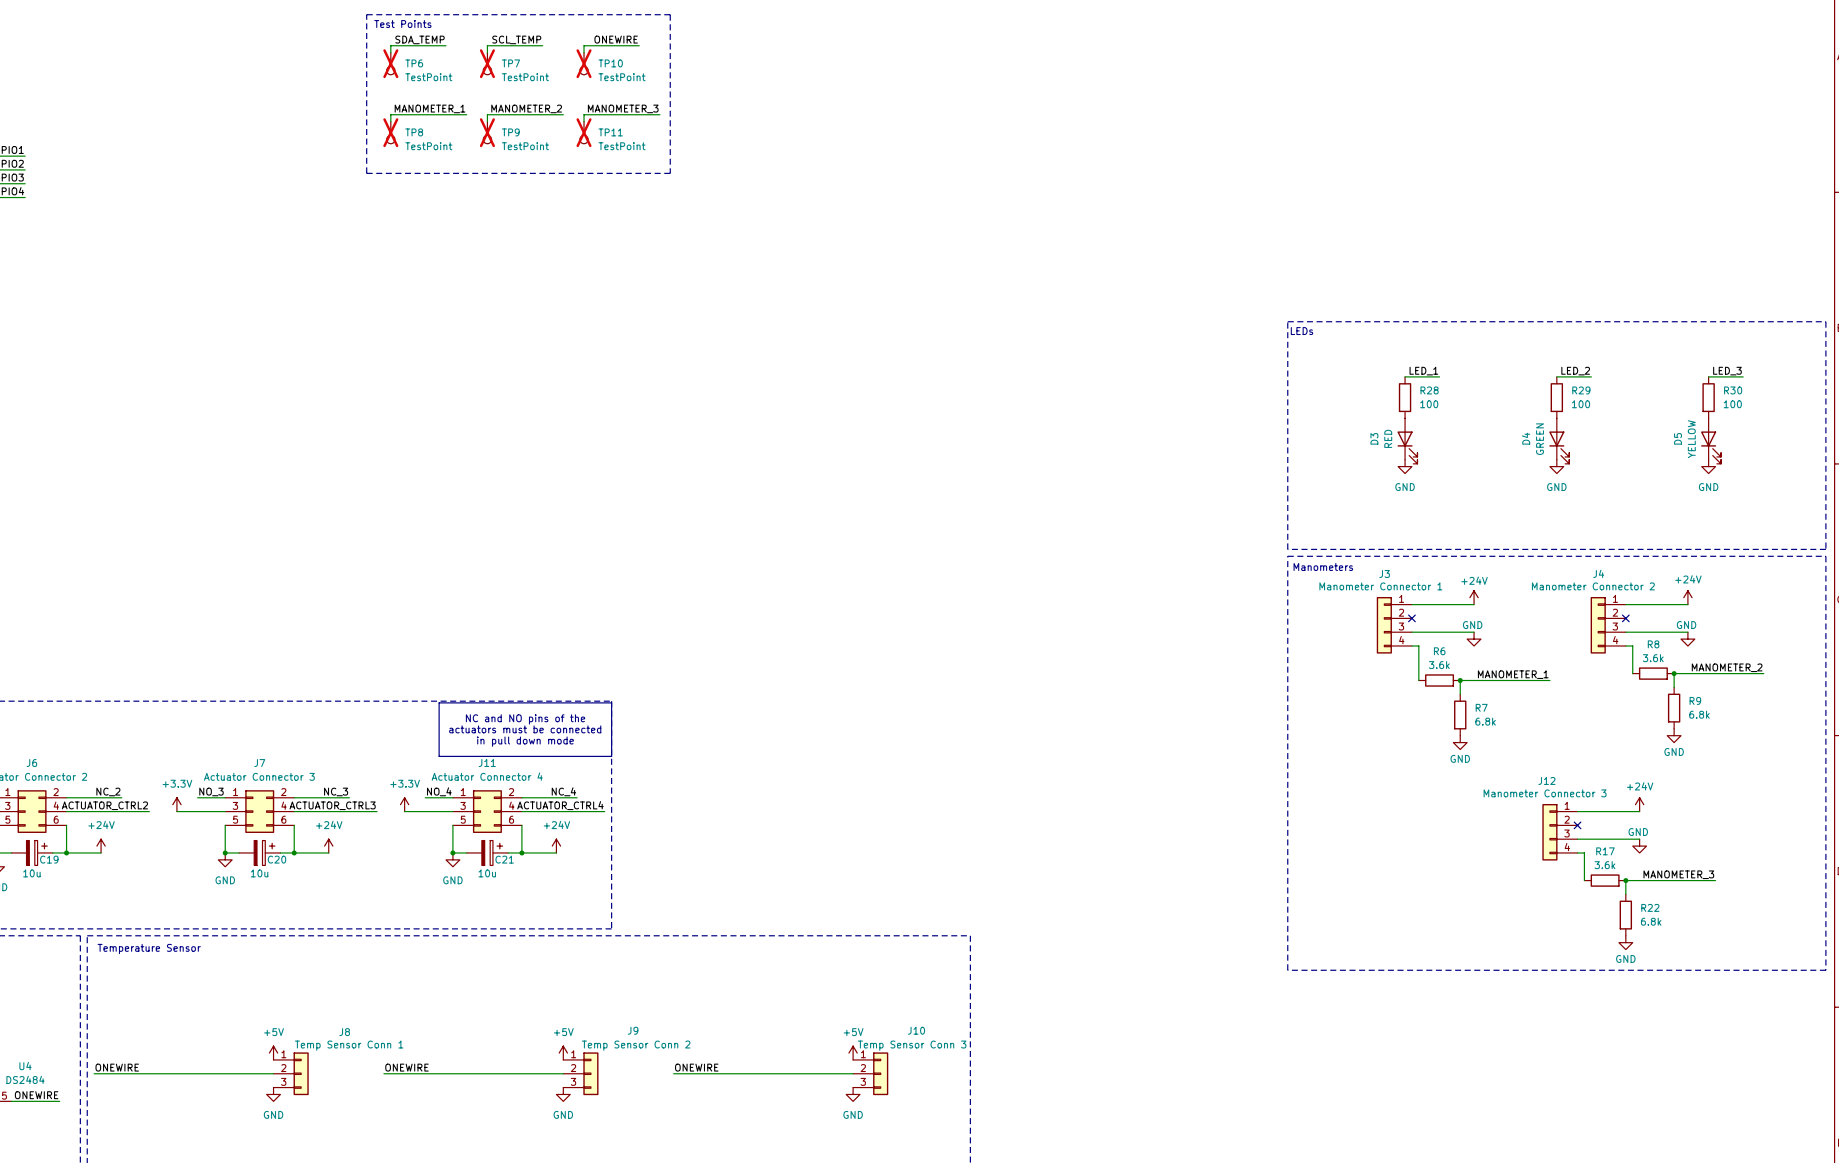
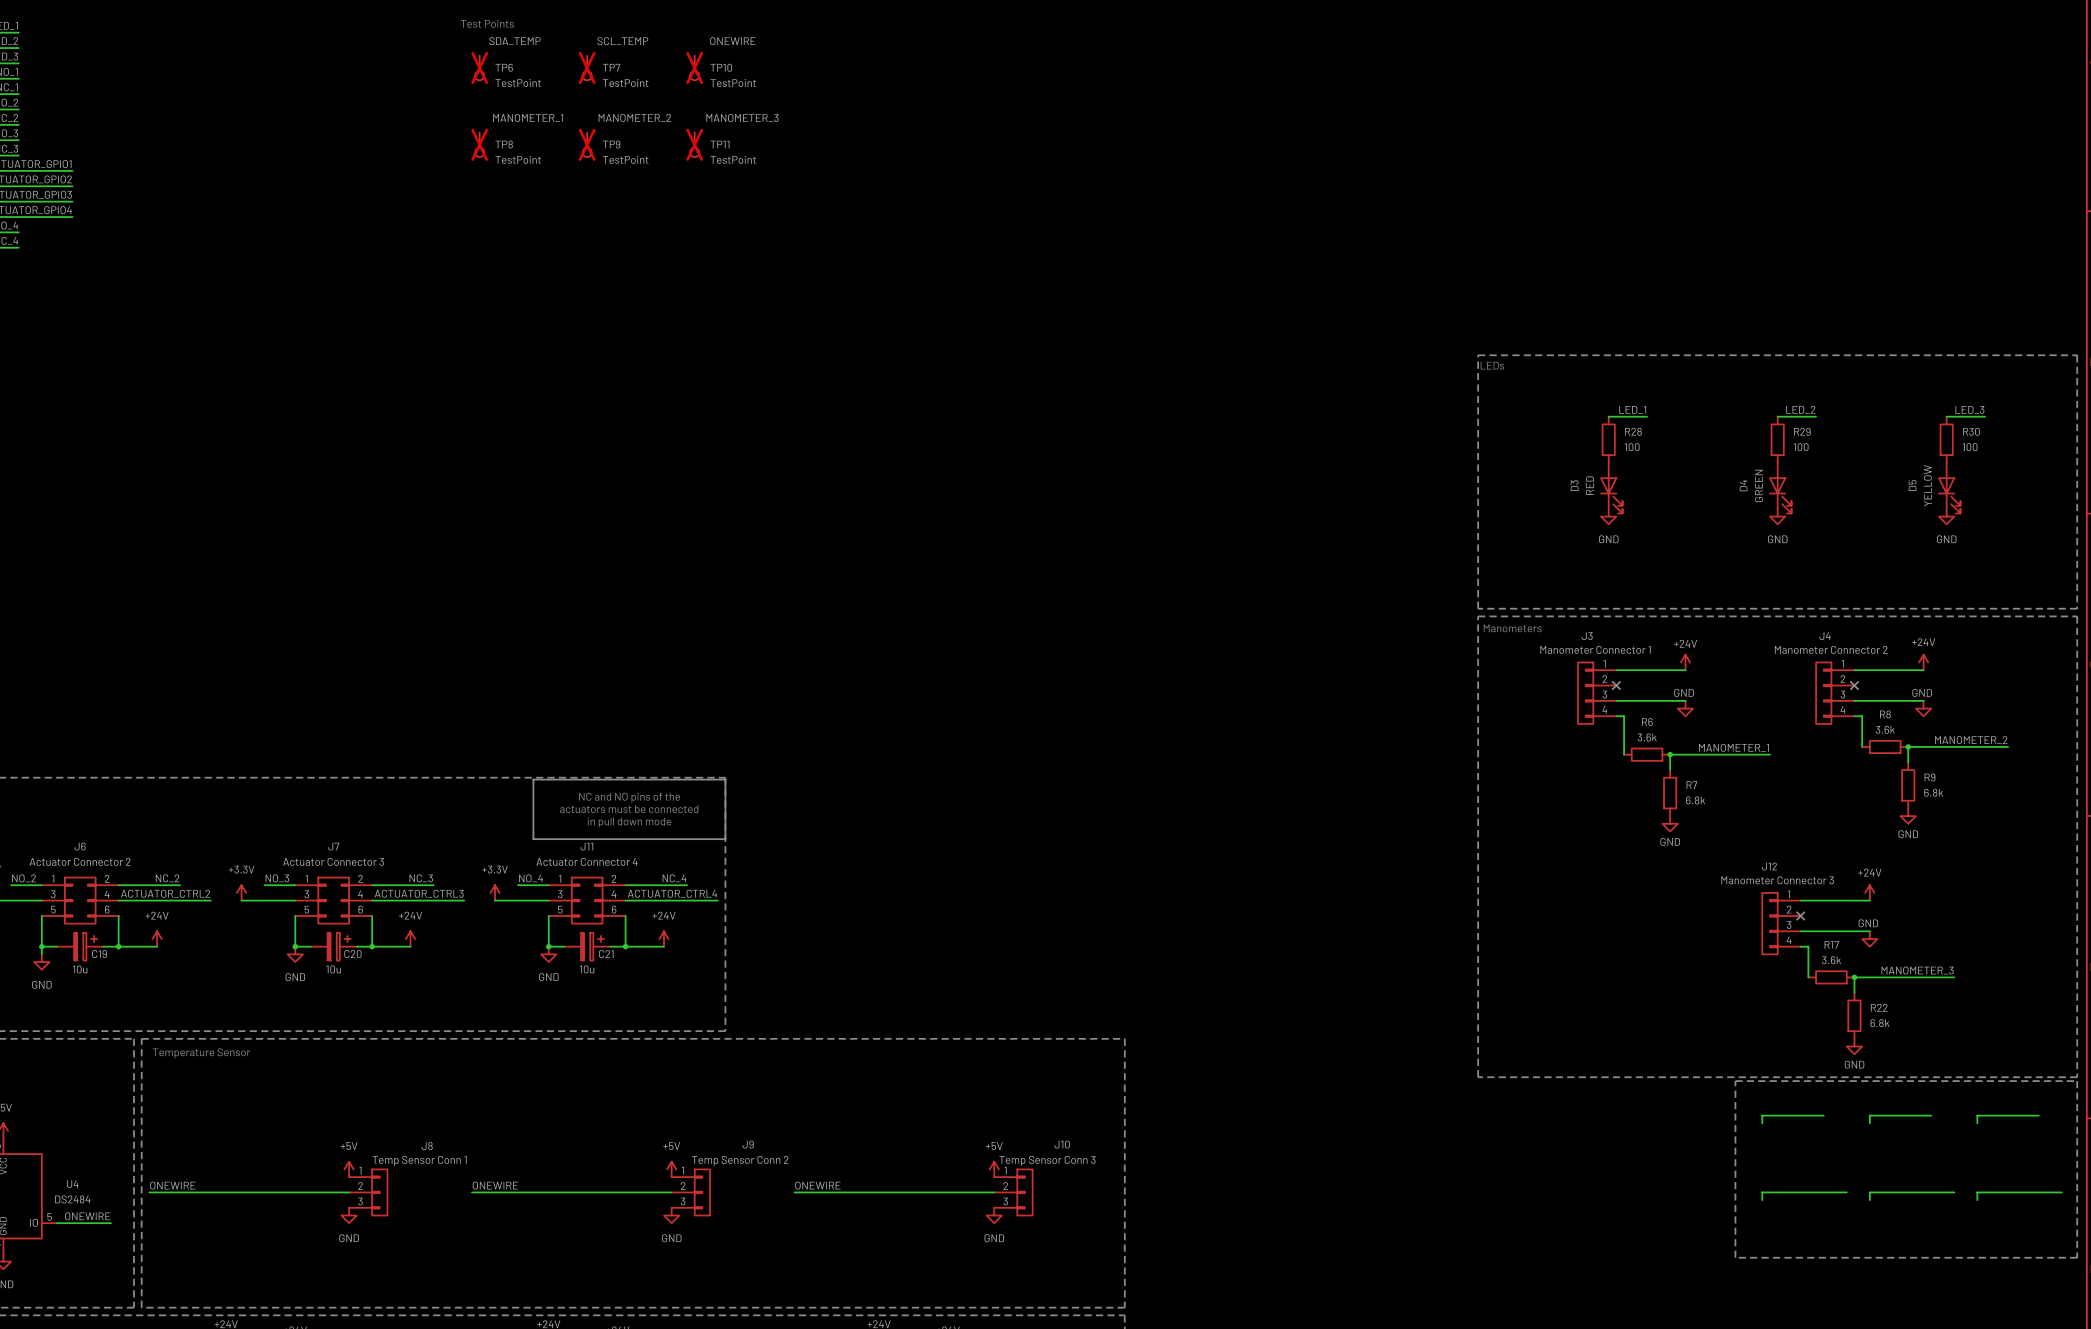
line: (366, 14) (670, 14) (670, 173) (366, 173) (366, 14) -> none
wire: (446, 45) (390, 45) (390, 52) -> none
wire: (542, 45) (487, 45) (487, 52) -> none
wire: (639, 45) (584, 45) (584, 52) -> none
wire: (466, 114) (390, 114) (390, 121) -> none
wire: (563, 114) (487, 114) (487, 121) -> none
wire: (659, 114) (584, 114) (584, 121) -> none
line: none -> (1735, 1081) (2077, 1081) (2077, 1257) (1735, 1257) (1735, 1081)
wire: none -> (1823, 1115) (1762, 1115) (1762, 1123)
wire: none -> (1931, 1115) (1869, 1115) (1869, 1123)
wire: none -> (2038, 1115) (1977, 1115) (1977, 1123)
wire: none -> (1846, 1192) (1762, 1192) (1762, 1200)
wire: none -> (1954, 1192) (1869, 1192) (1869, 1200)
wire: none -> (2061, 1192) (1977, 1192) (1977, 1200)

